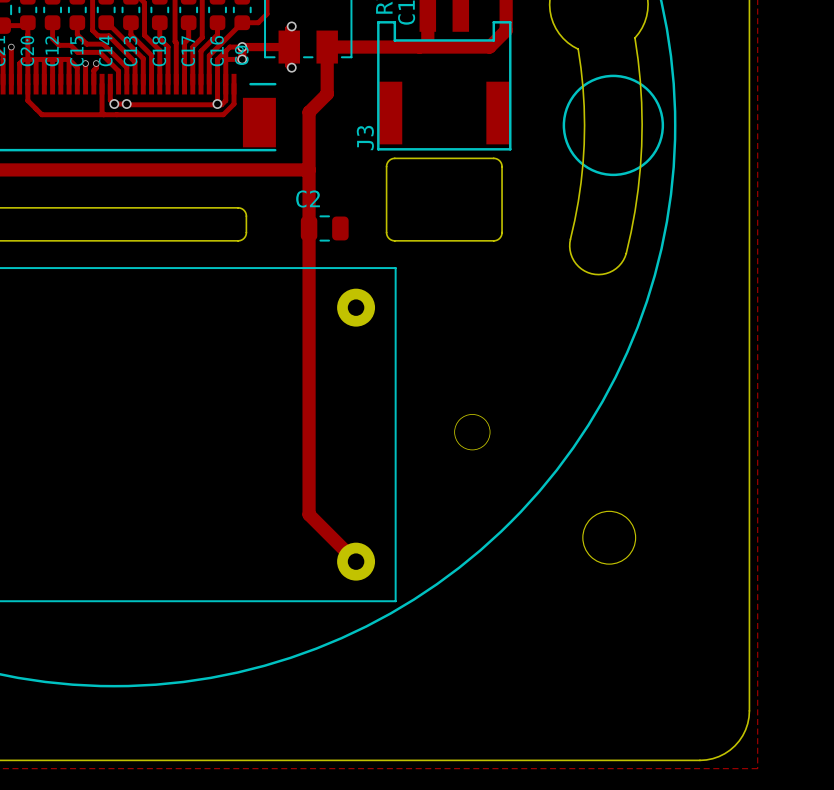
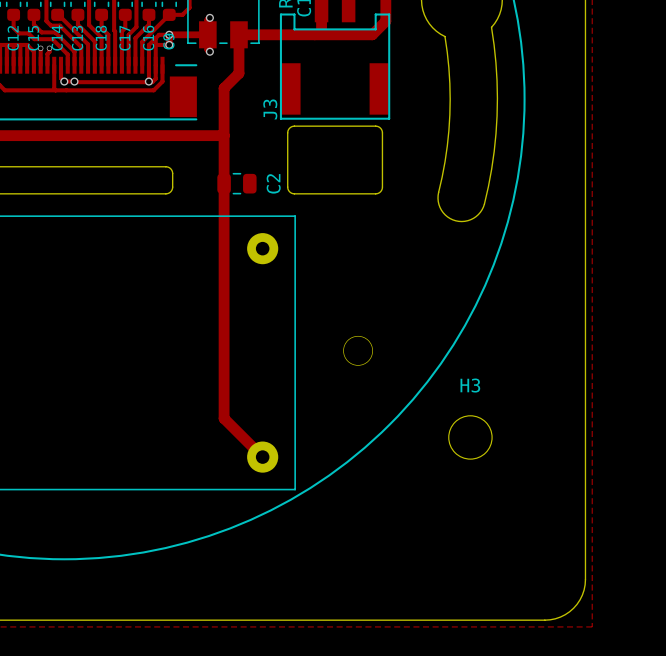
drawing: [562, 74, 665, 177] -> none
C2 name rotation: 0° (308, 199) -> 90° counterclockwise (273, 183)
C2 name position: C2 (308, 199) -> C2 (273, 183)
H3 name: none -> H3 (470, 385)

